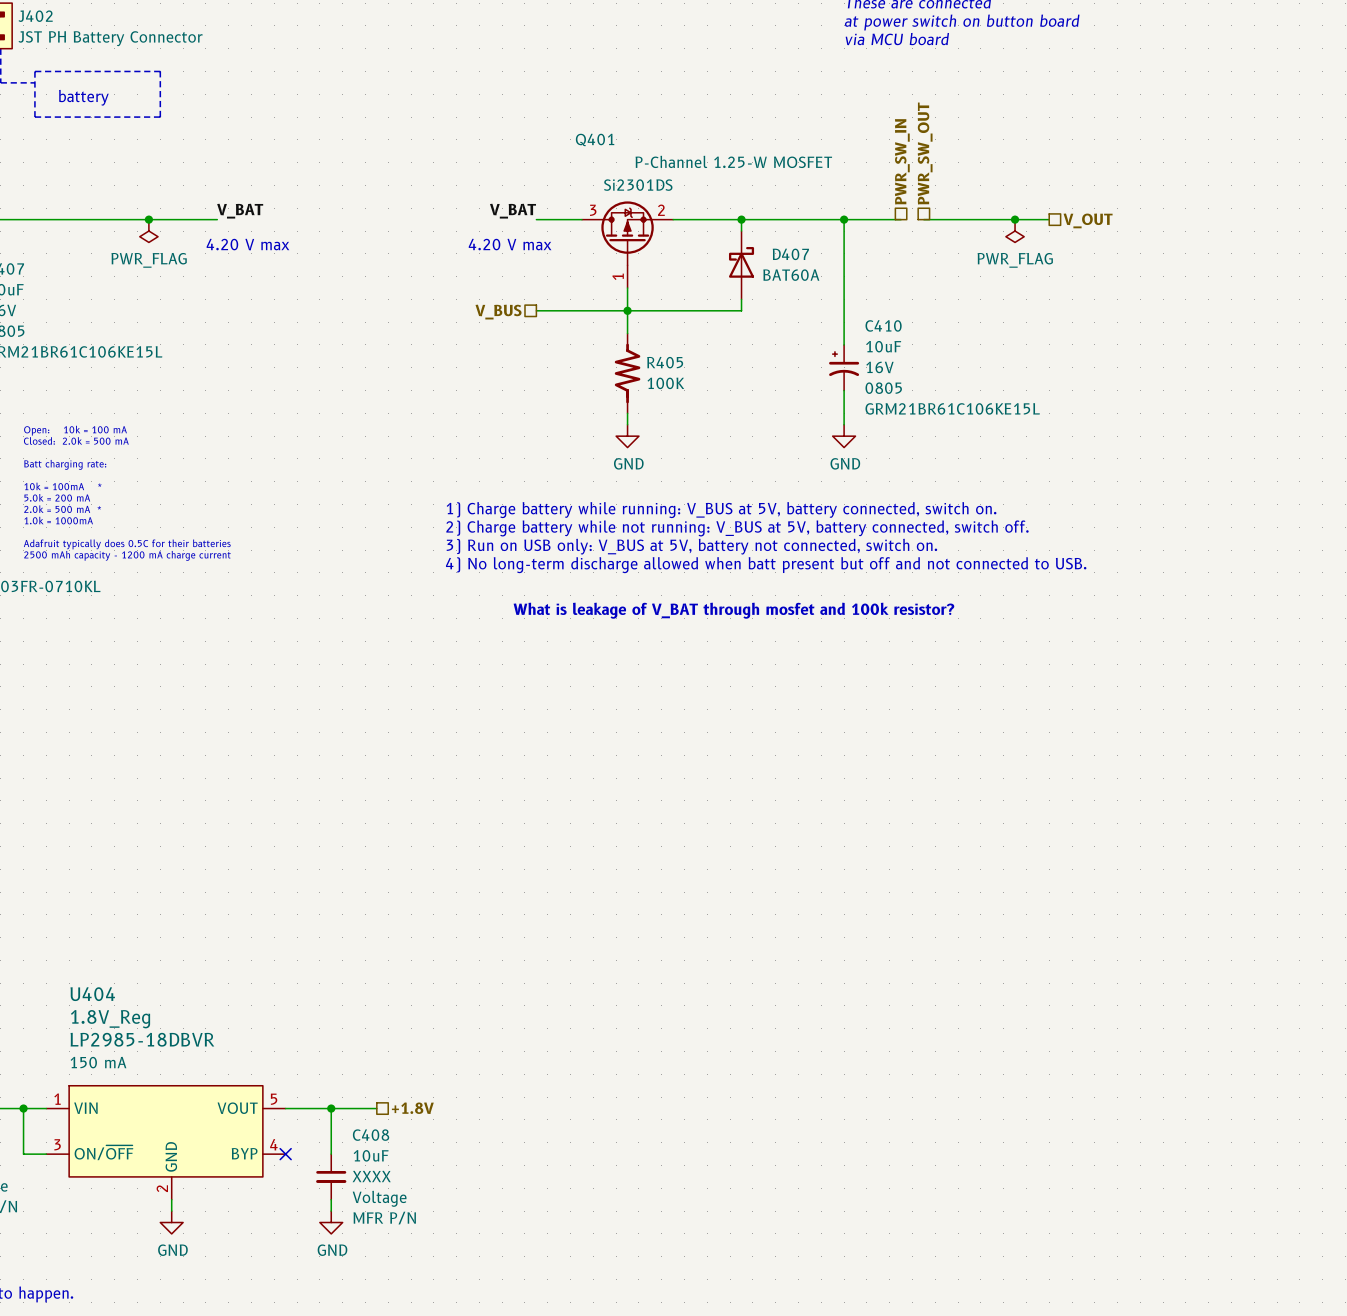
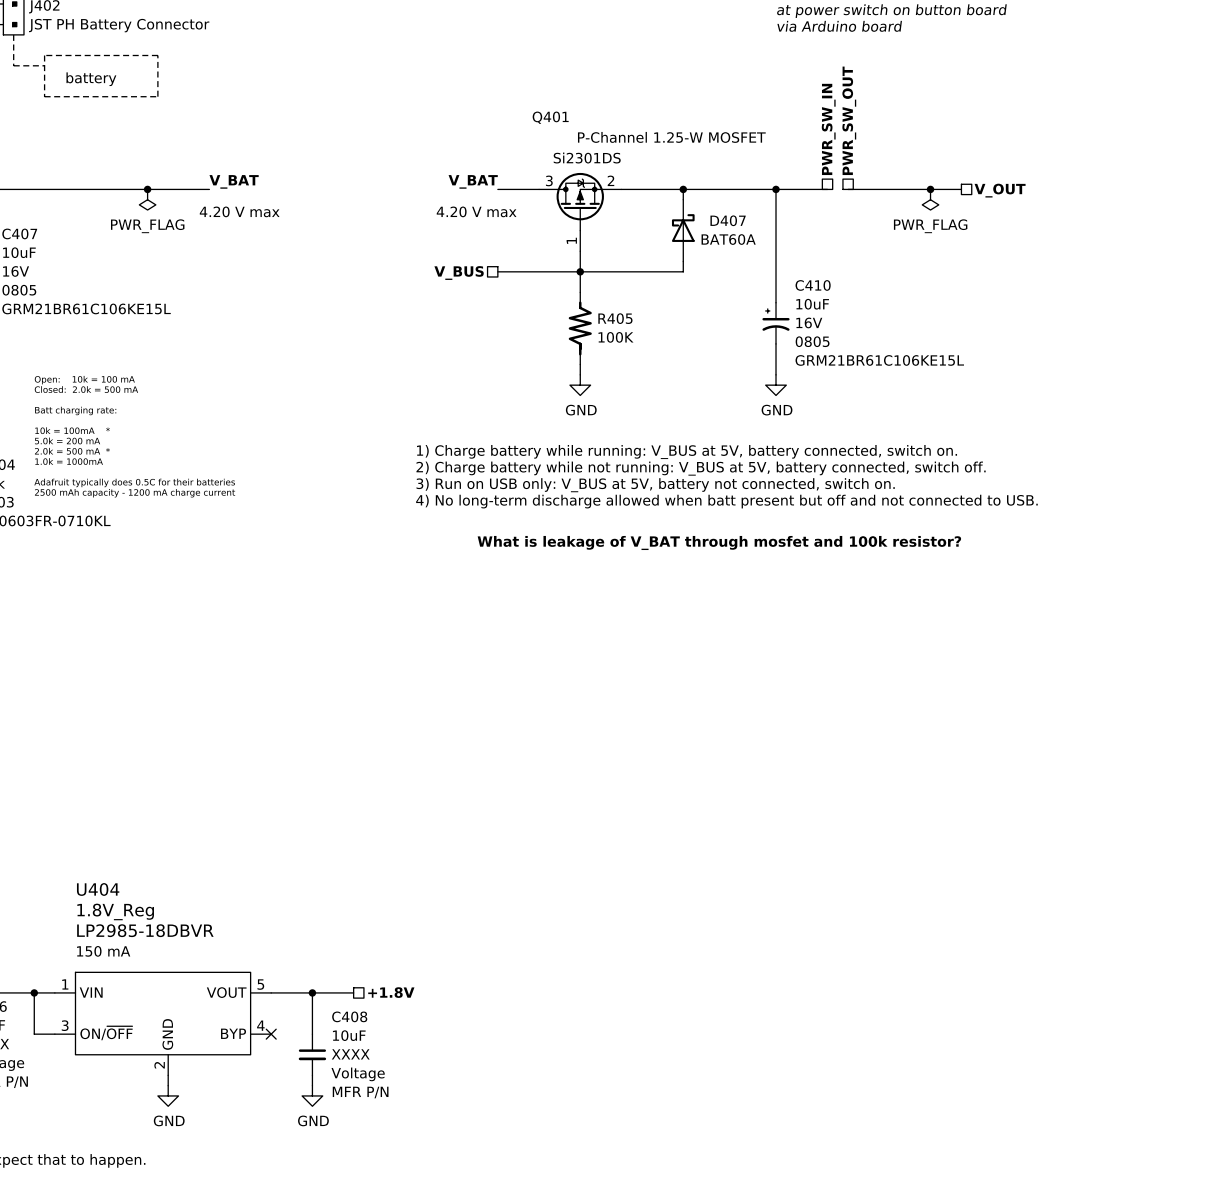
text: via MCU board (897, 39) -> via Arduino board (839, 26)

